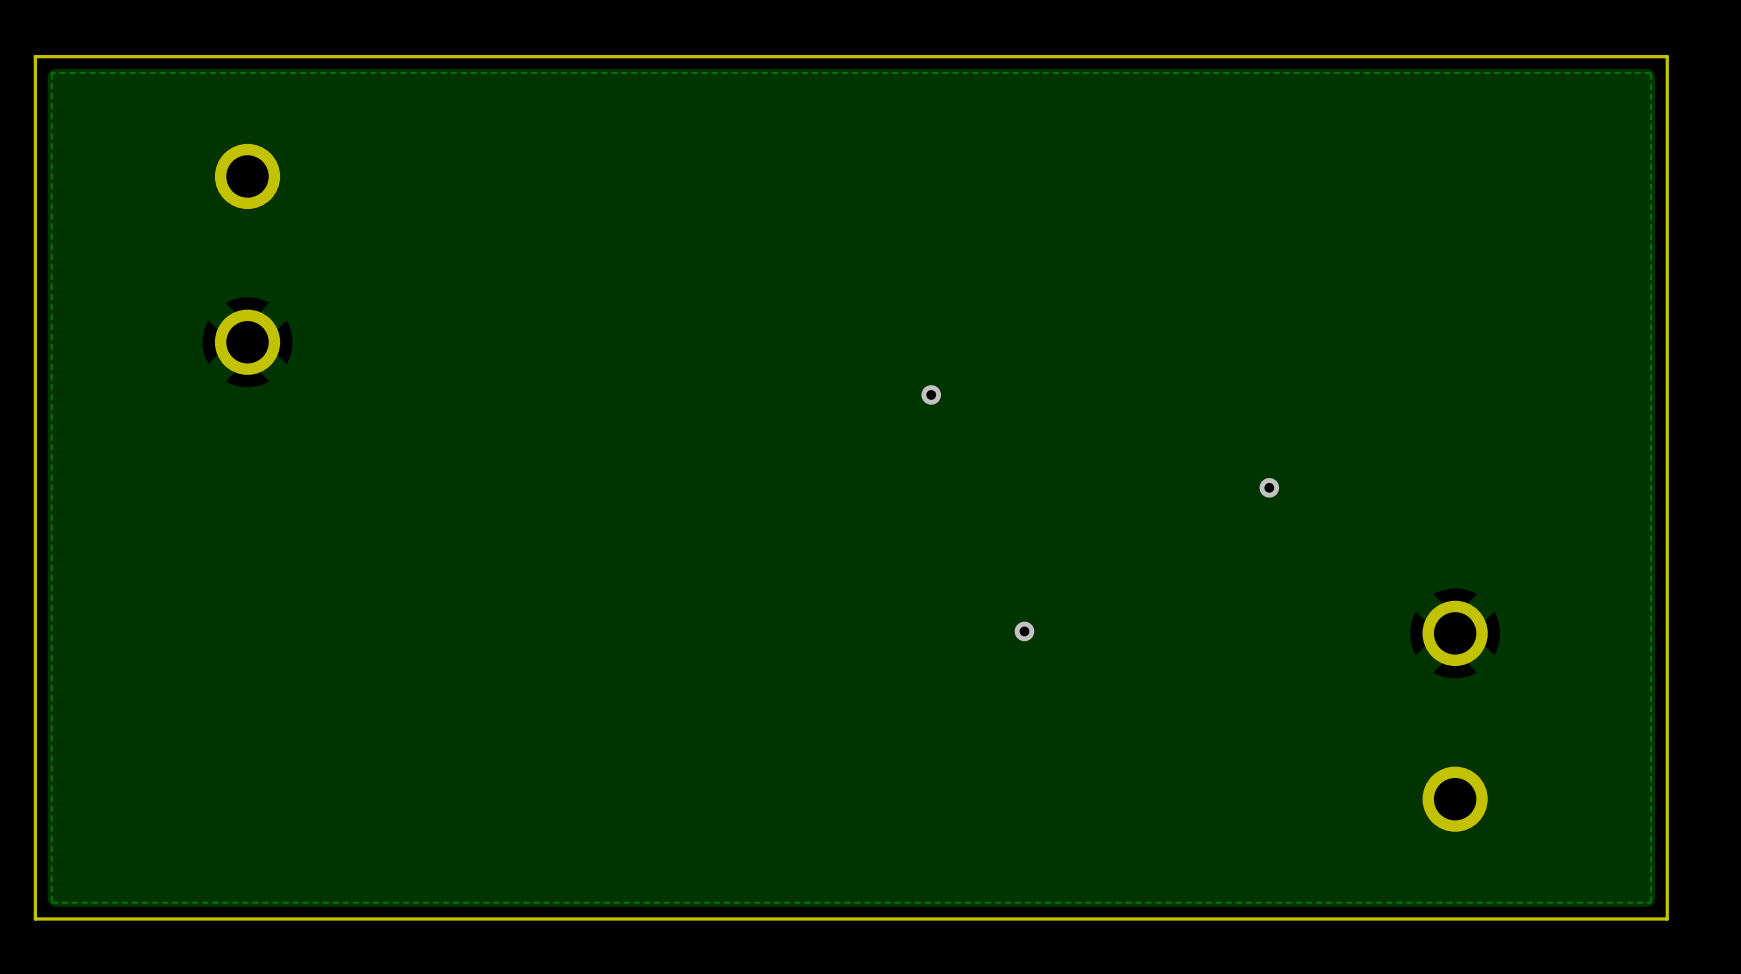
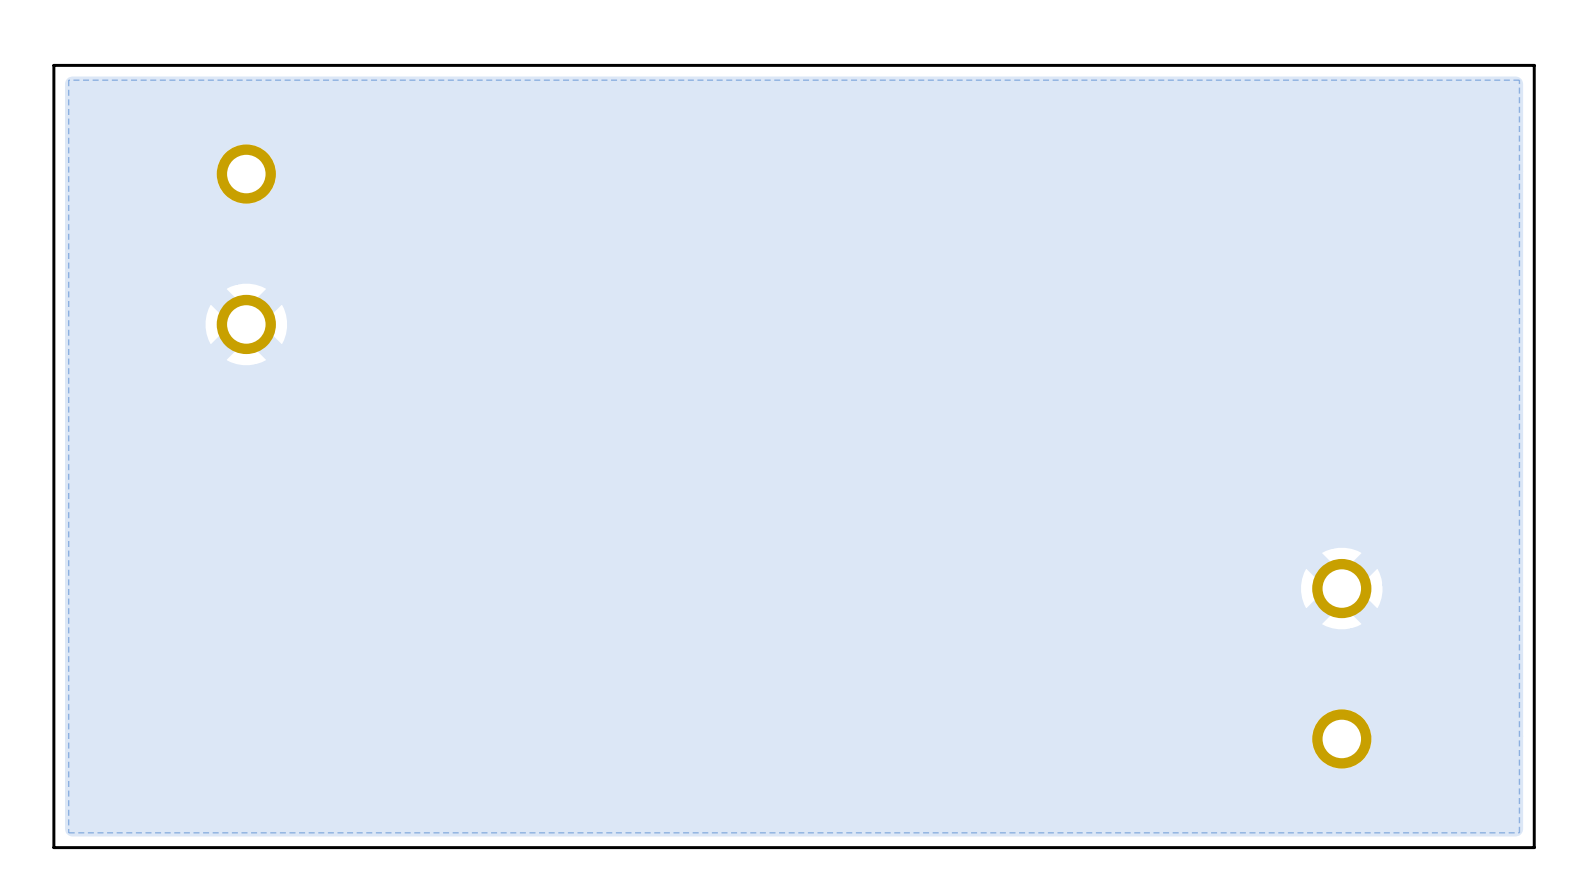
via: (931, 394) -> none
via: (1269, 487) -> none
via: (1024, 631) -> none

